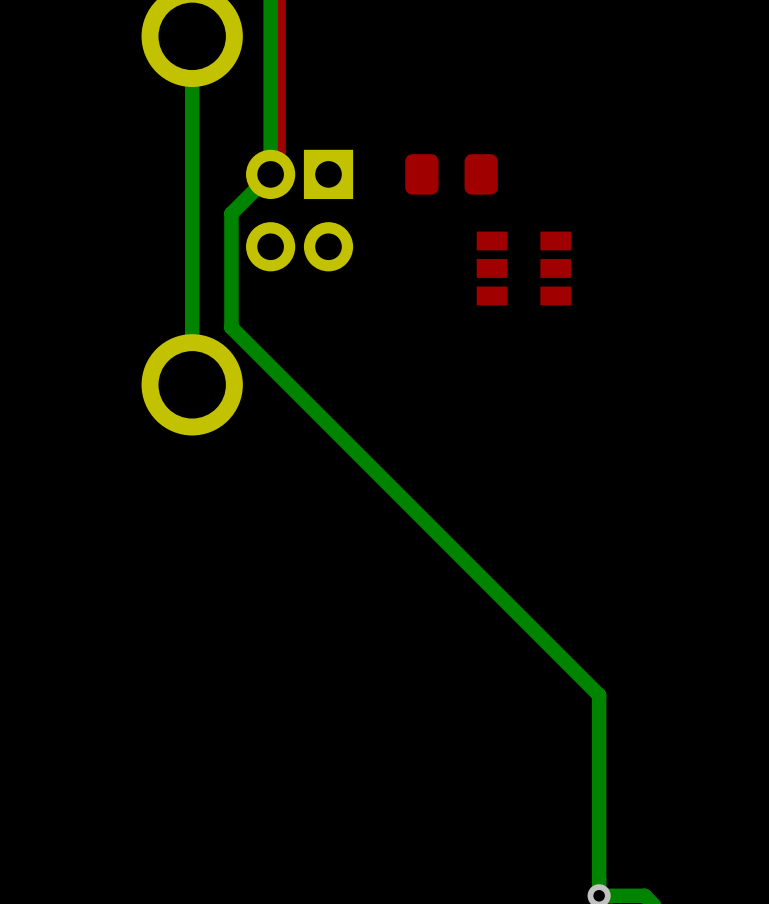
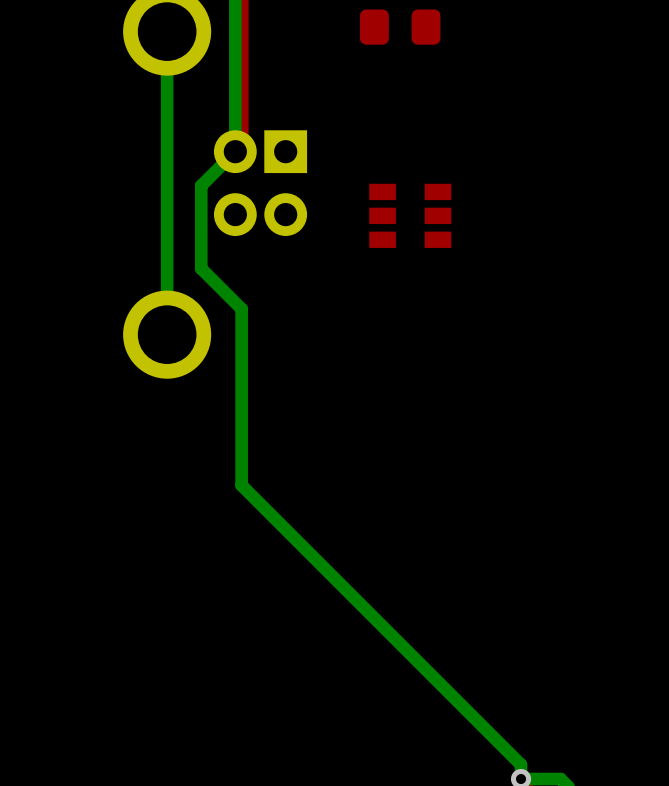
part position: (451, 174) -> (400, 27)
part position: (523, 268) -> (410, 215)
bottom track: (231, 308) (231, 327) (599, 695) (599, 879) -> (201, 268) (241, 308) (241, 485) (521, 764)

